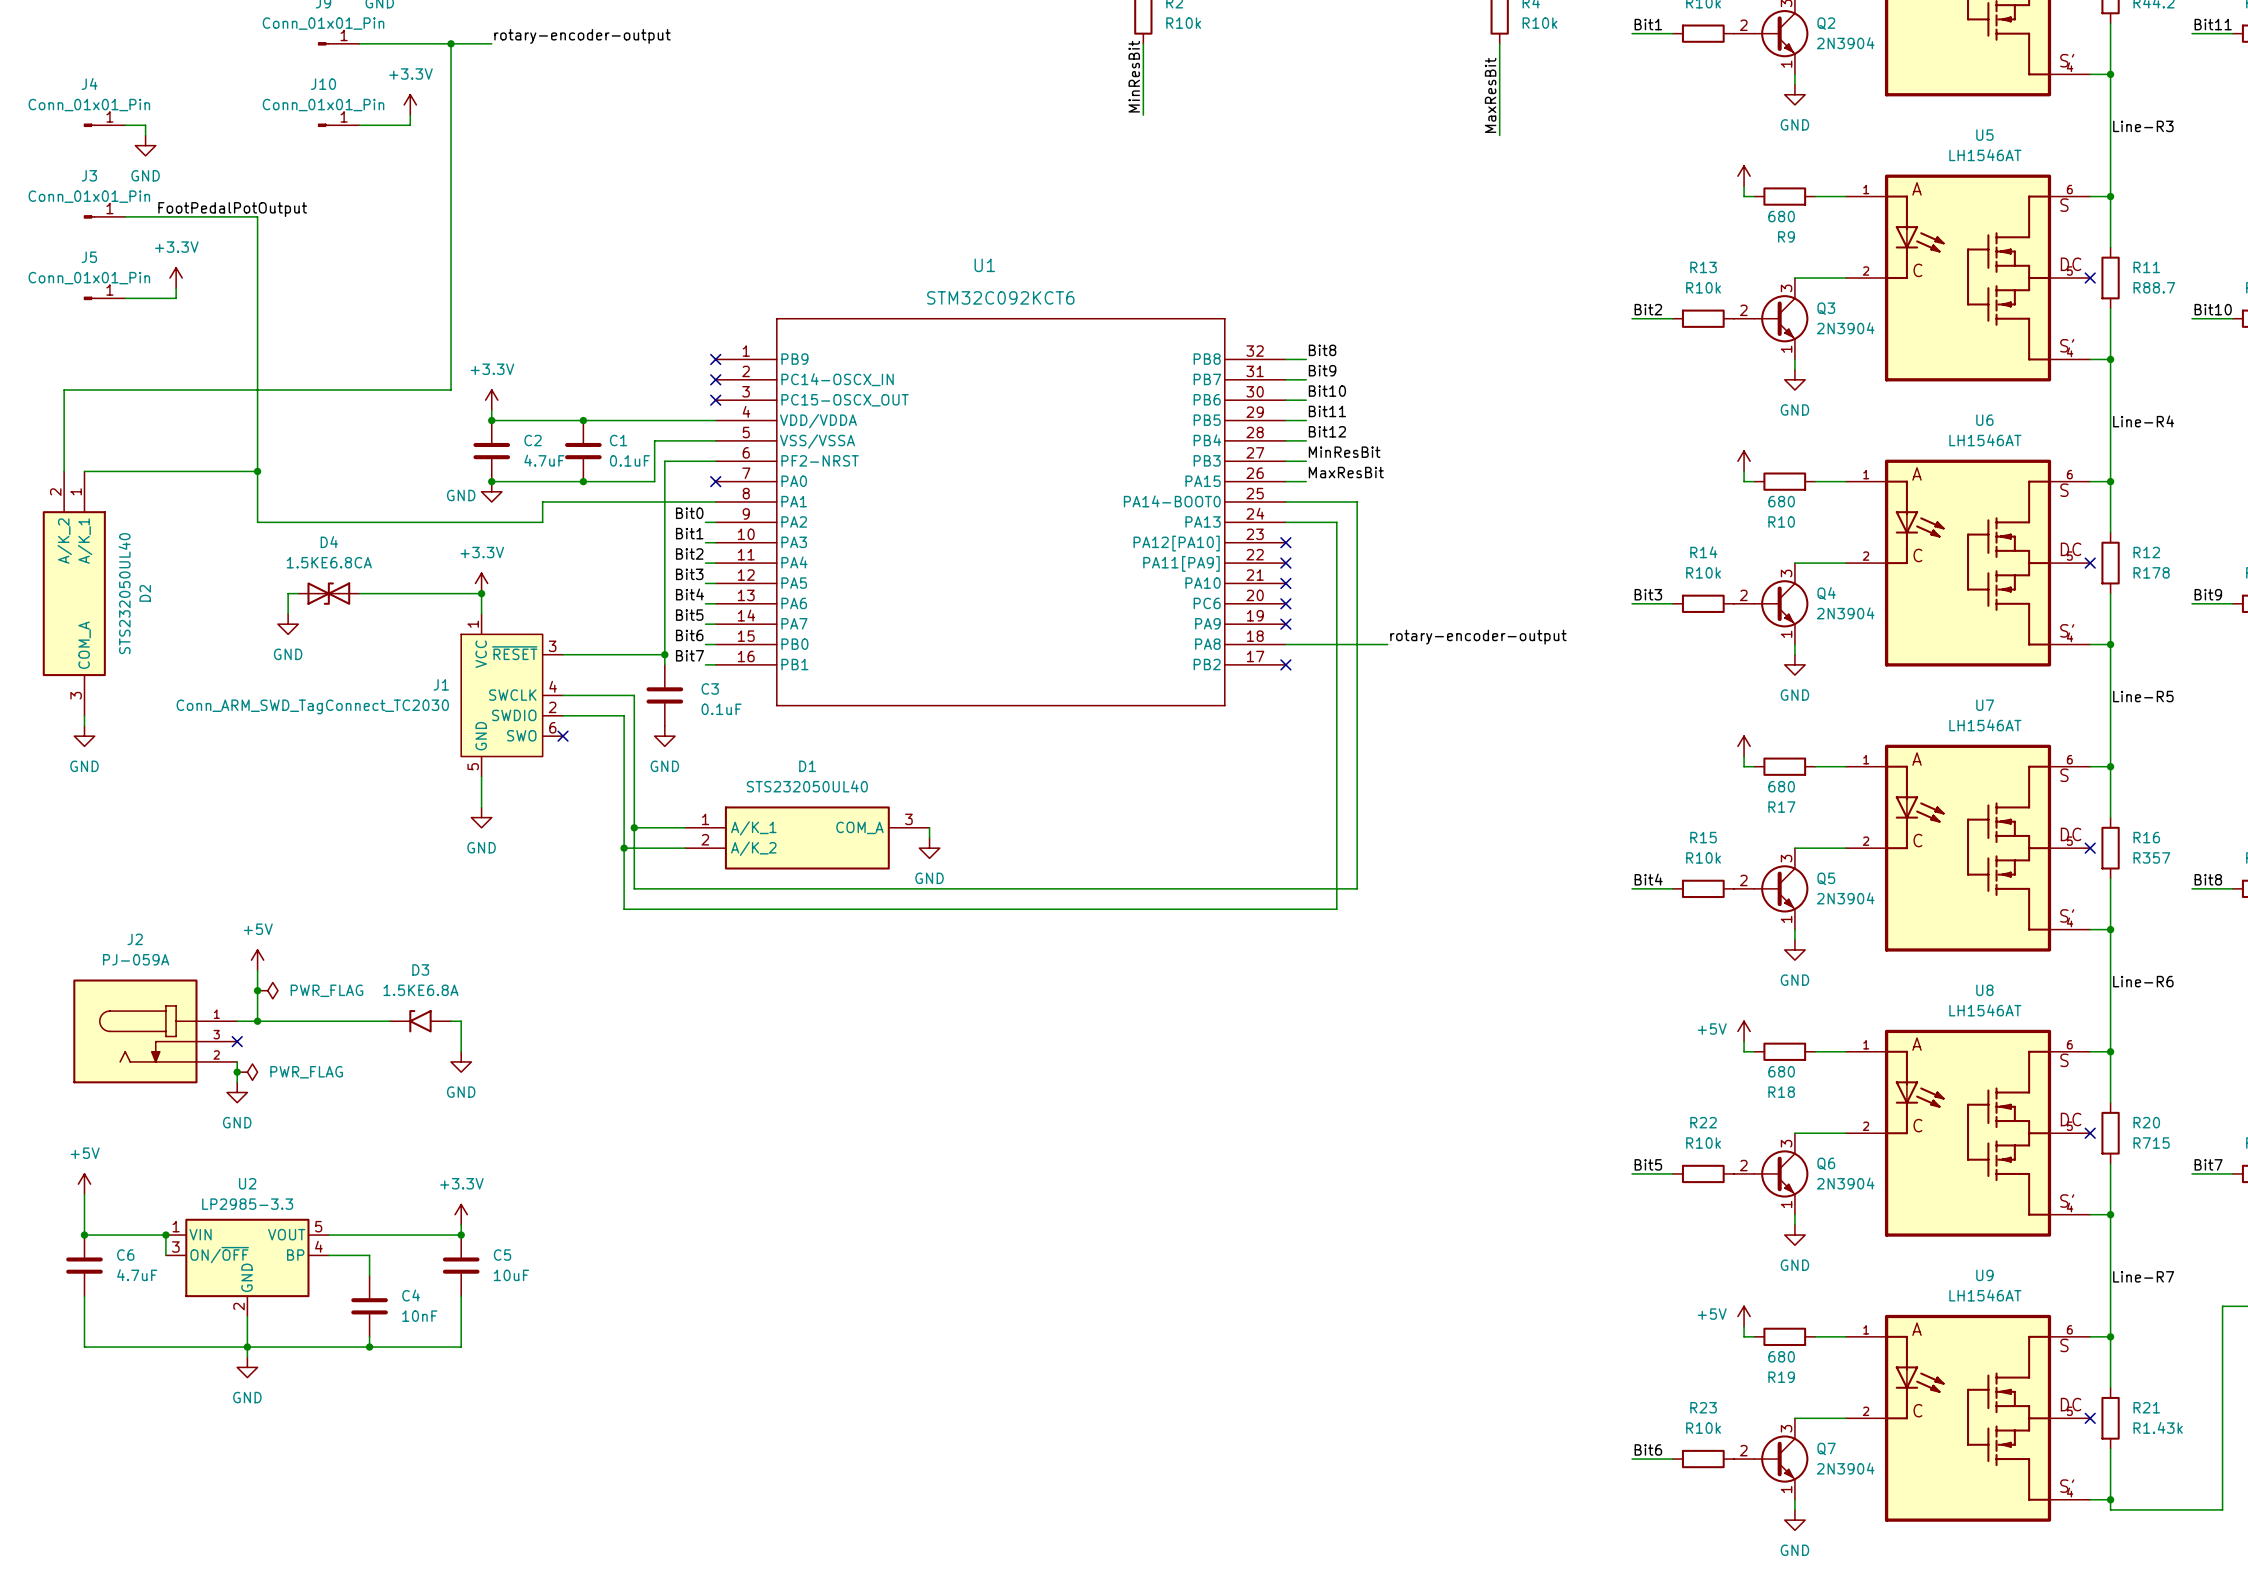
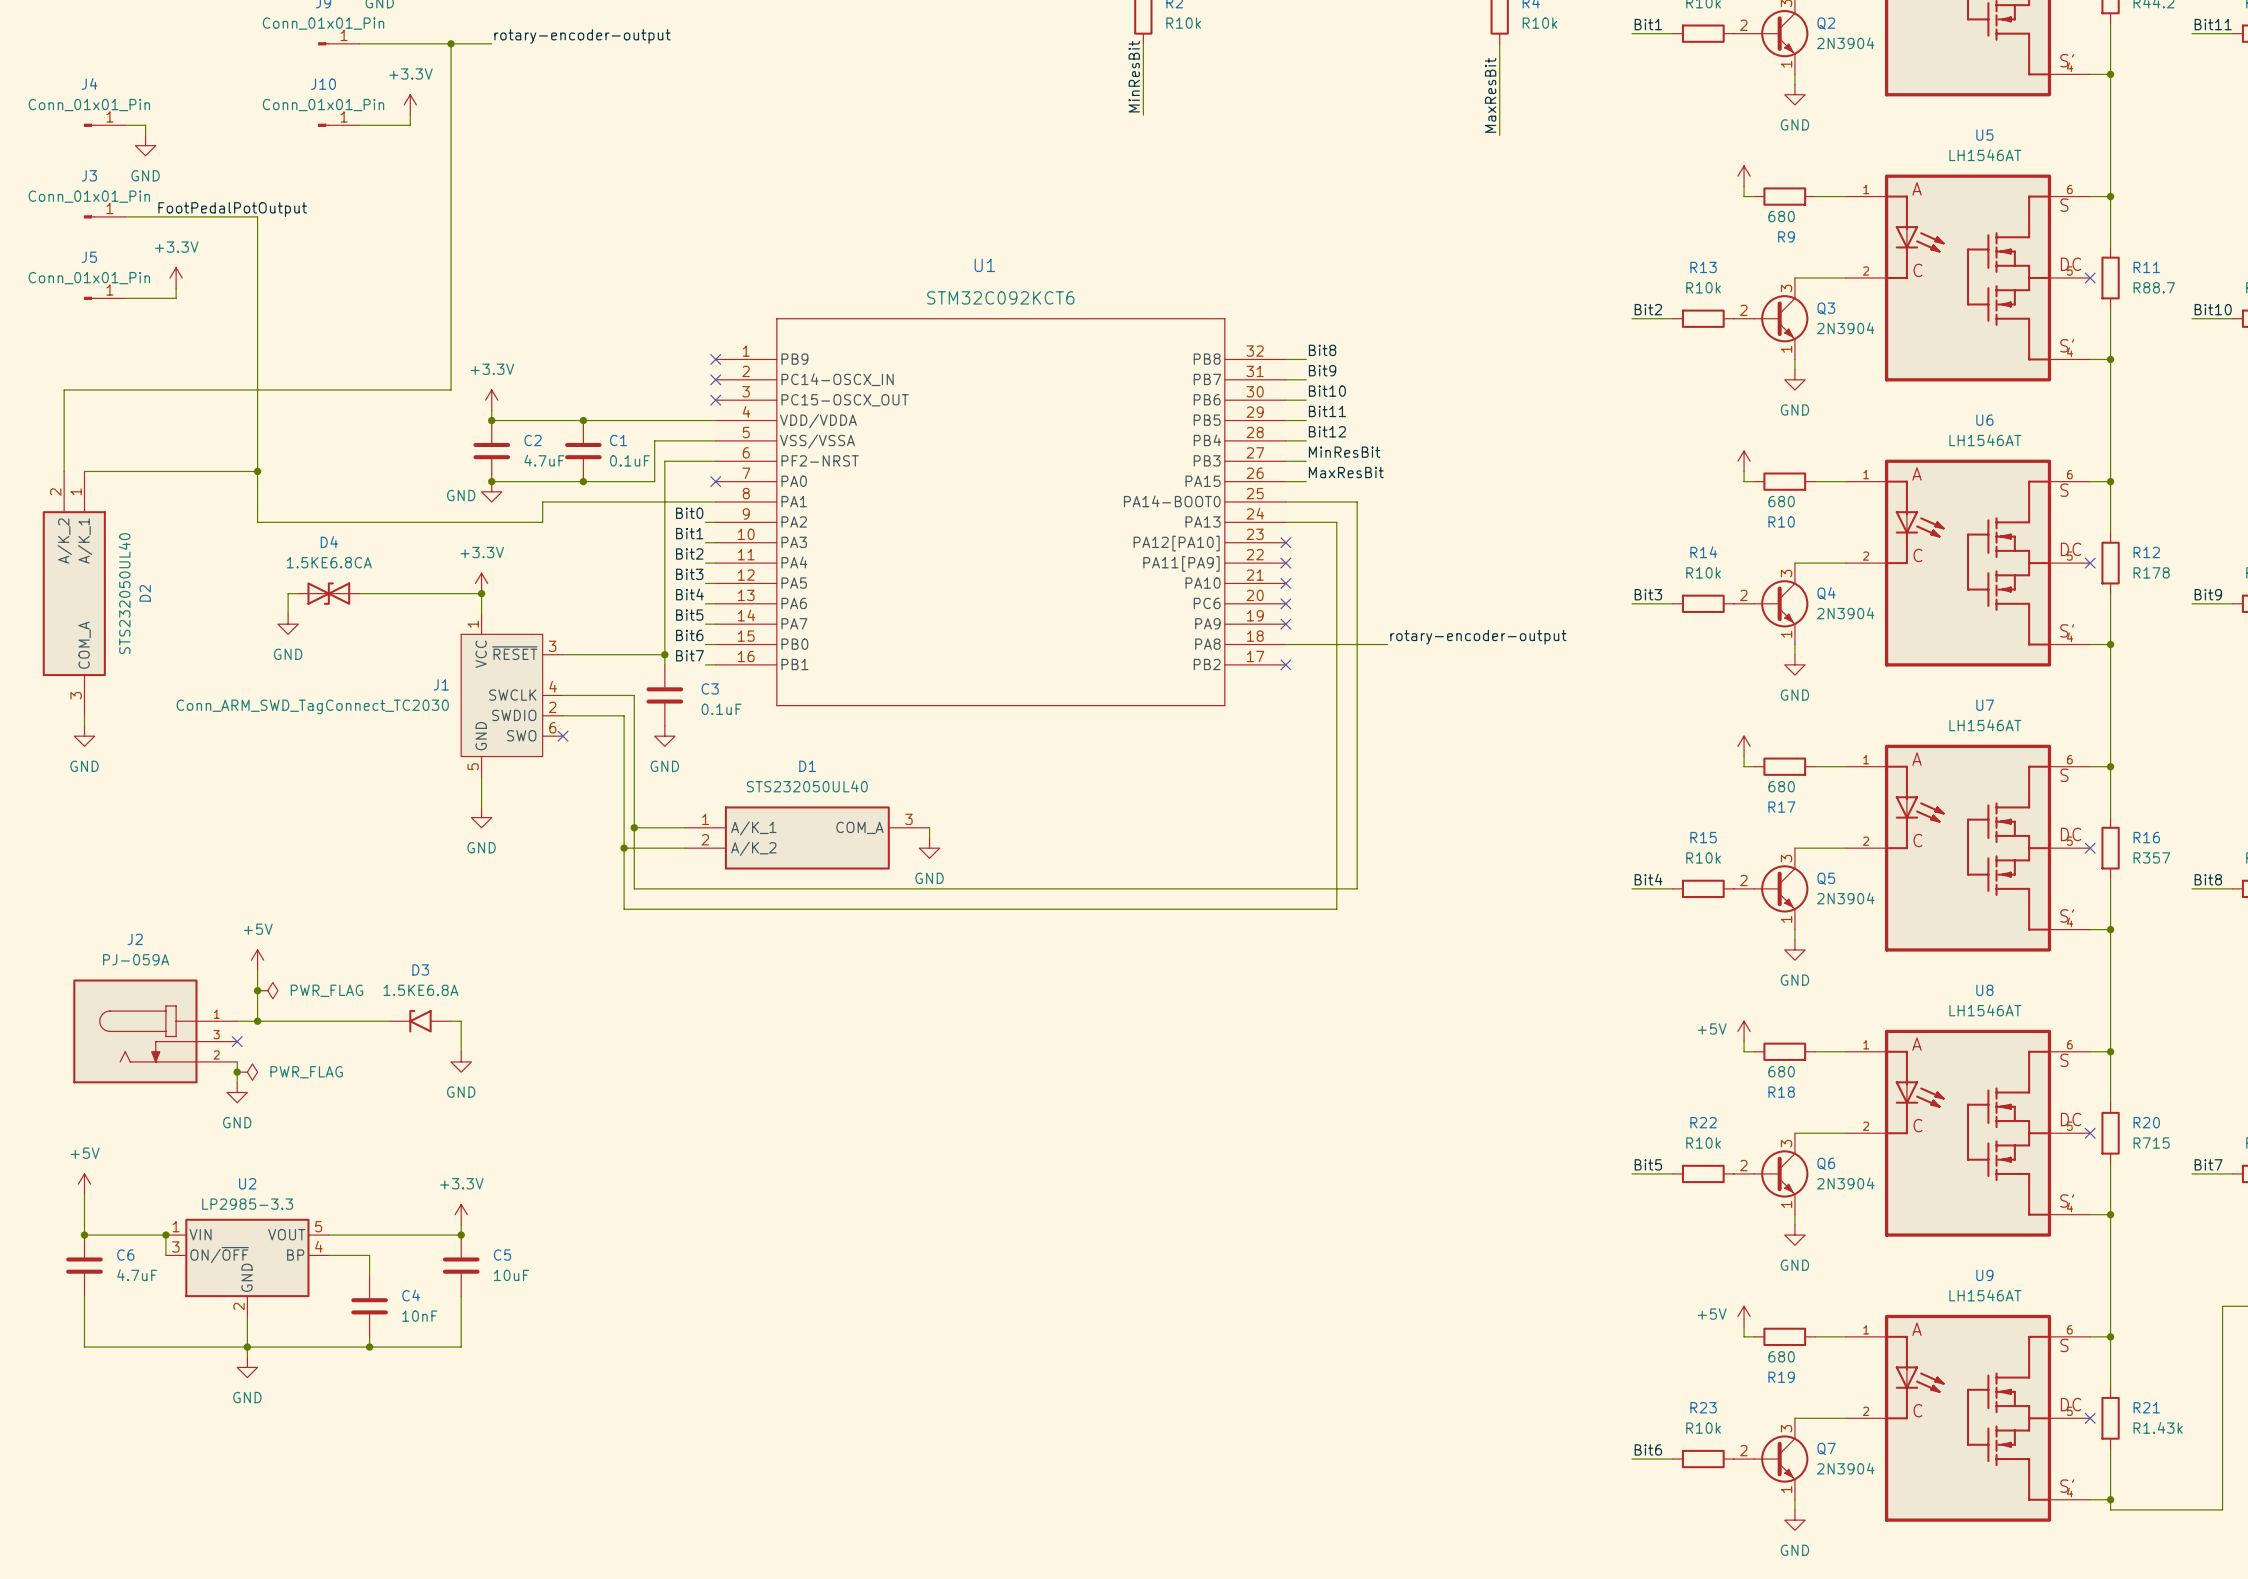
label: Line-R3 (2143, 126) -> none
label: Line-R4 (2143, 421) -> none
label: Line-R5 (2143, 696) -> none
label: Line-R6 (2143, 981) -> none
label: Line-R7 (2143, 1276) -> none

